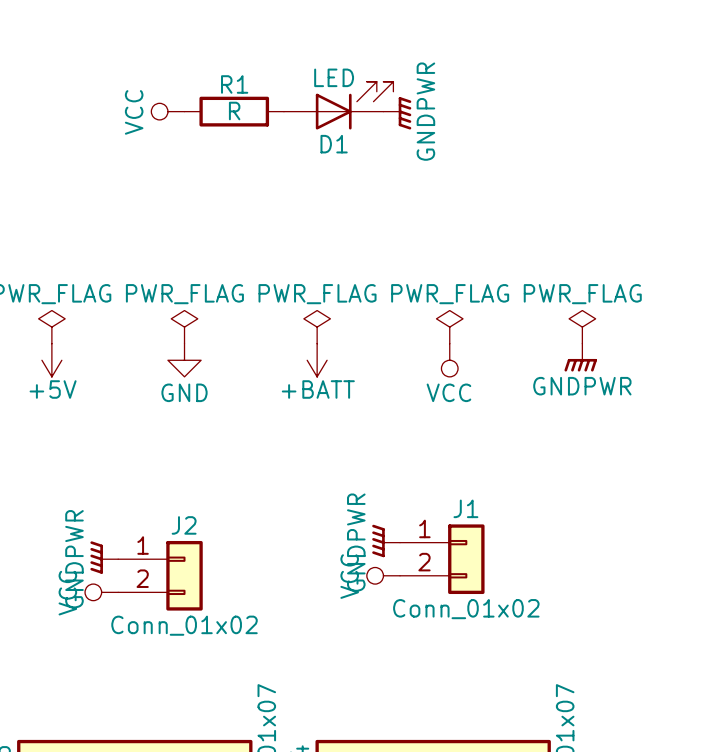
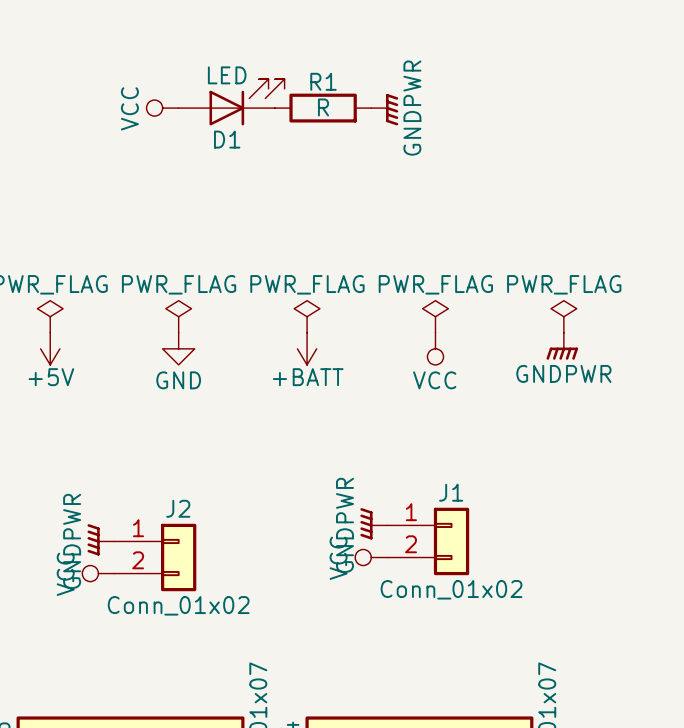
D1 position: (338, 105) -> (231, 102)
R1 position: (234, 111) -> (323, 108)

